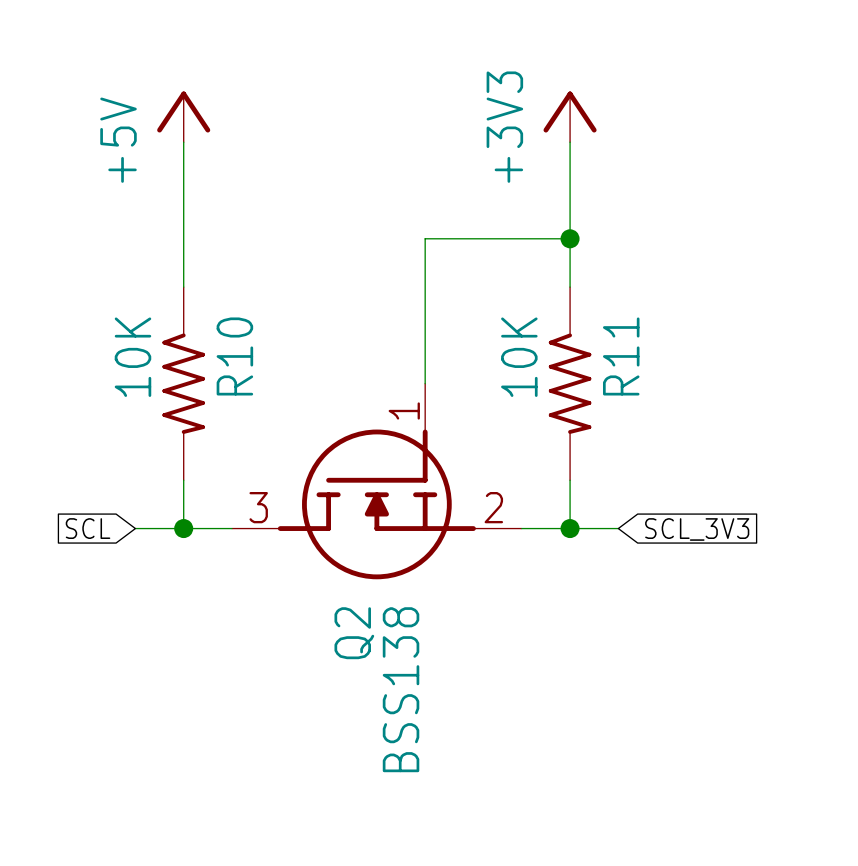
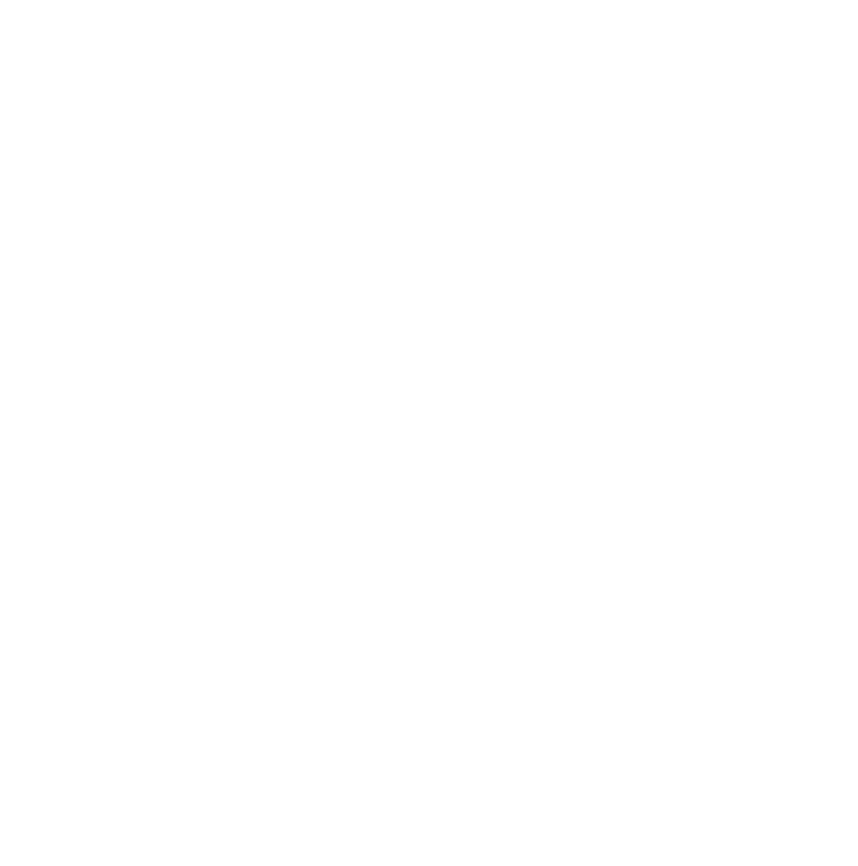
power symbol: +5V (183, 116) -> none
power symbol: +3V3 (570, 116) -> none
wire: (183, 142) (183, 287) -> none
wire: (570, 142) (570, 287) -> none
wire: (570, 238) (425, 238) (425, 383) -> none
junction: (570, 238) -> none
R10: 10K (183, 383) -> none
R11: 10K (570, 383) -> none
wire: (183, 480) (183, 528) -> none
wire: (570, 480) (570, 528) -> none
Q2: BSS138 (376, 481) -> none
global label: SCL (88, 528) -> none
wire: (135, 528) (231, 528) -> none
junction: (183, 528) -> none
wire: (521, 528) (618, 528) -> none
junction: (570, 528) -> none
global label: SCL_3V3 (697, 529) -> none

